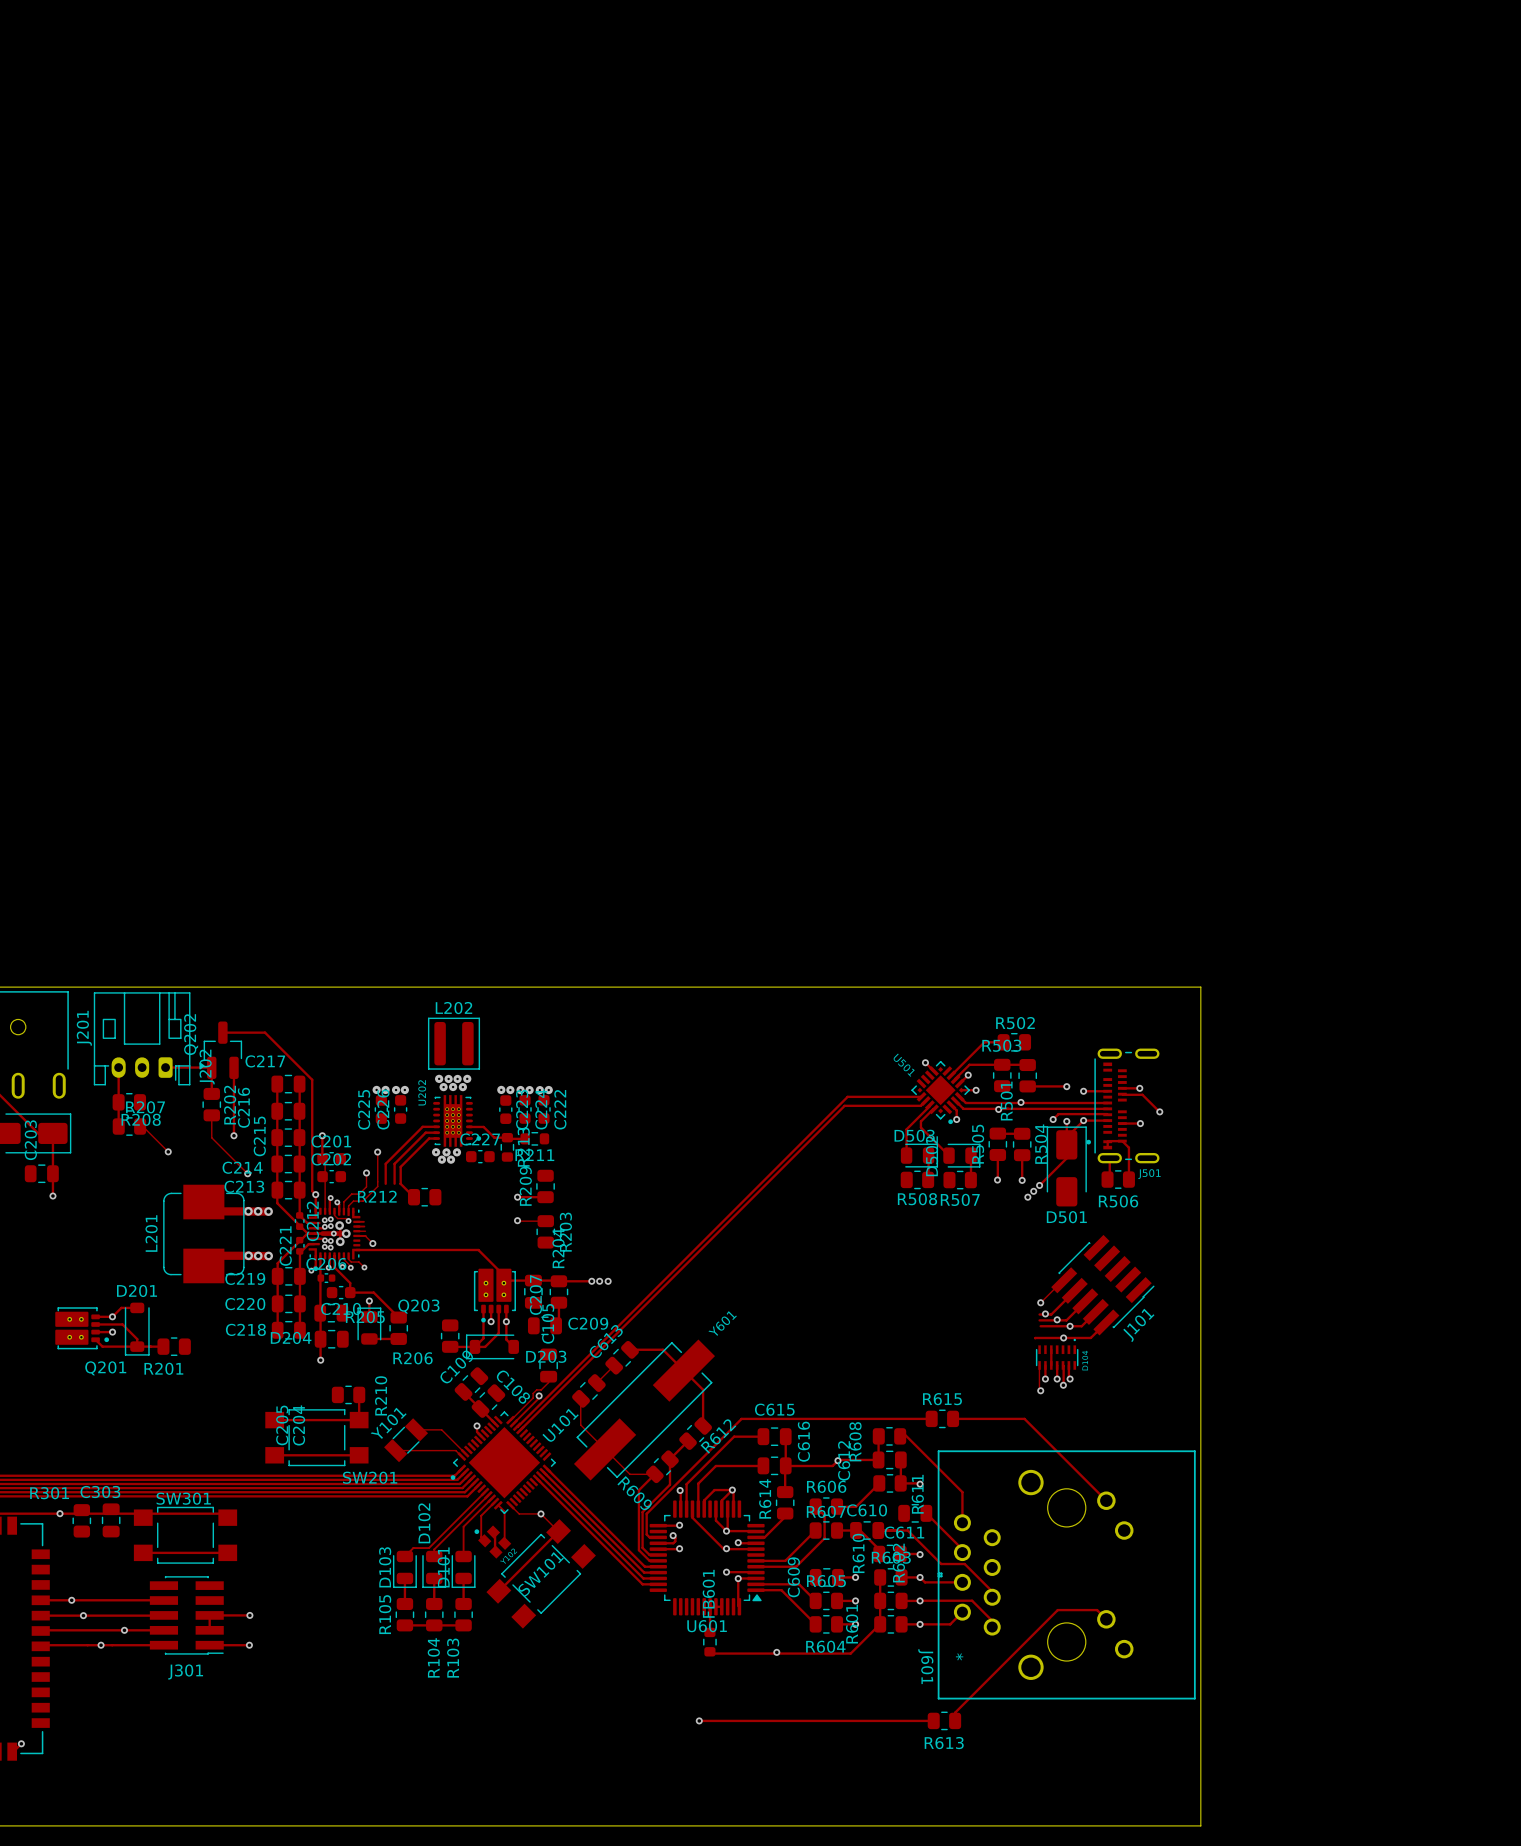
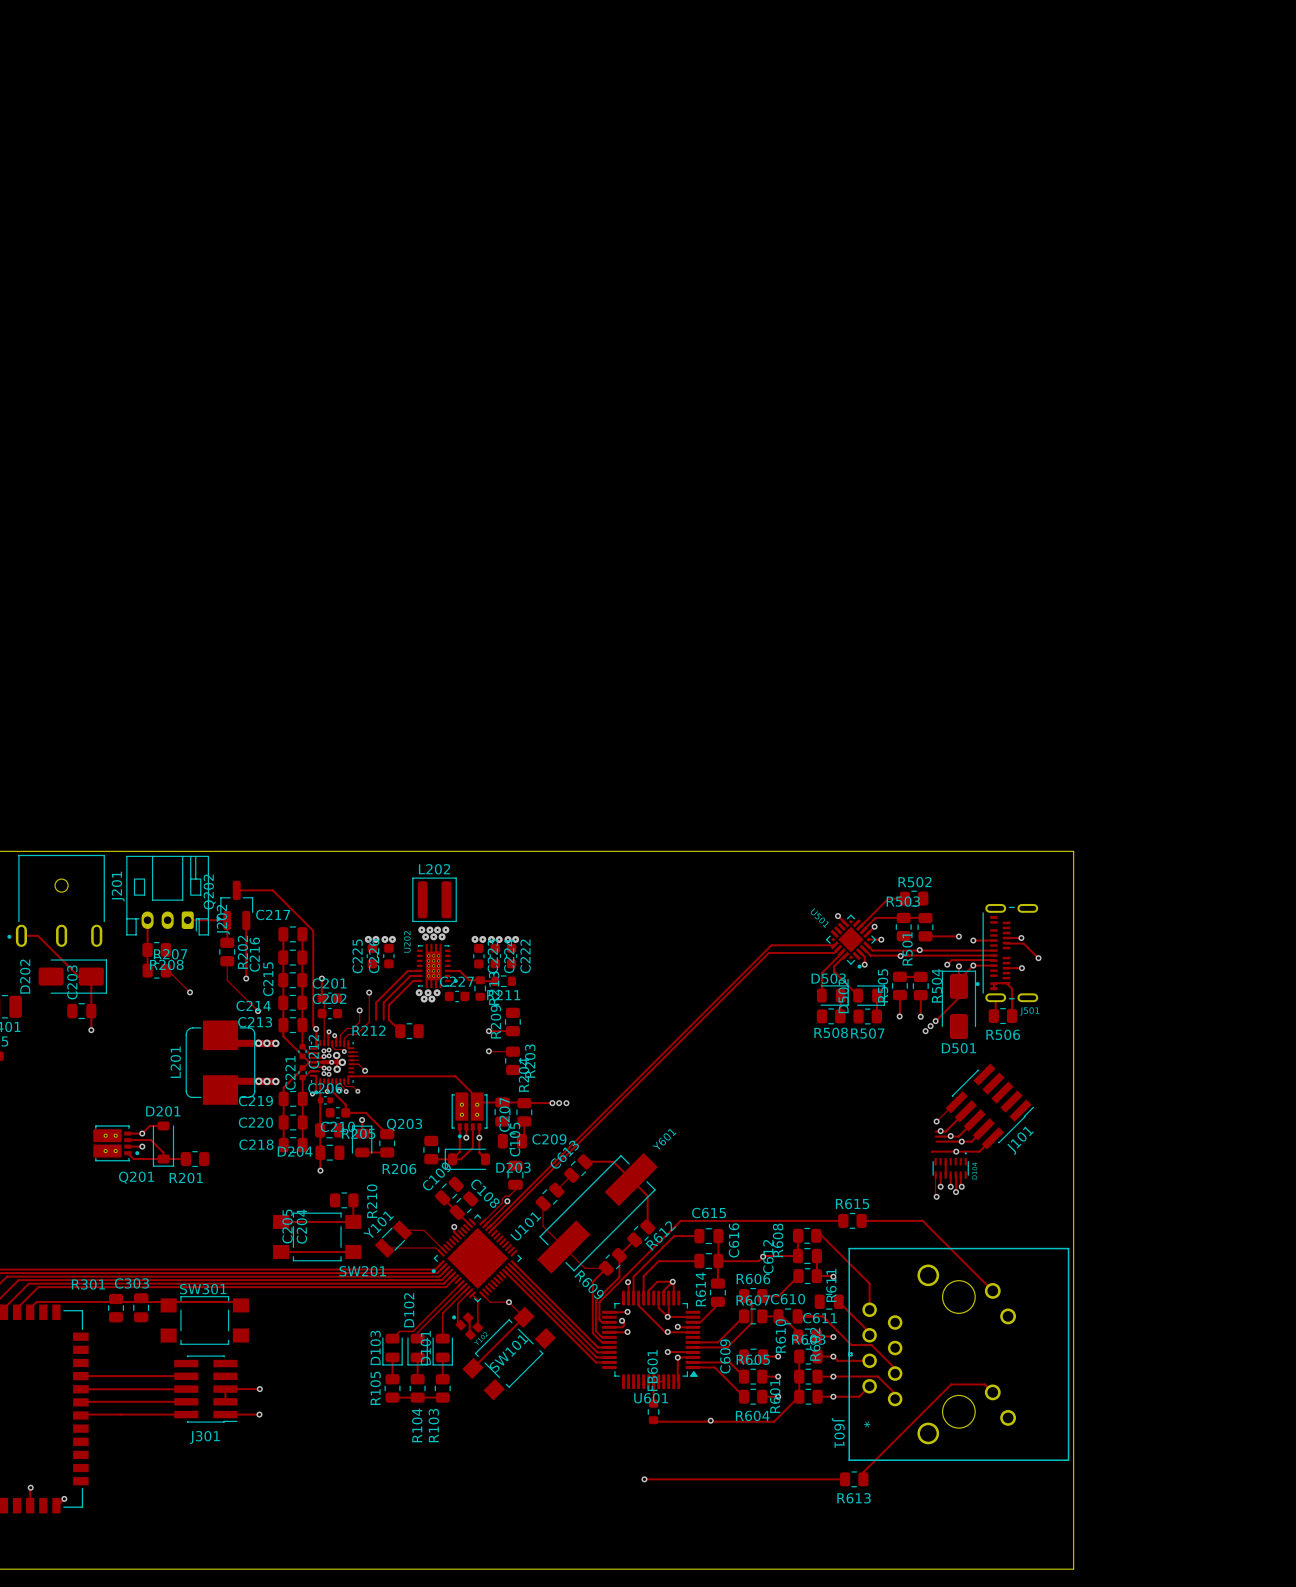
via: (59, 1513) -> none
track: (143, 1552) (227, 1552) -> none
via: (71, 1600) -> none
via: (83, 1615) -> none
via: (124, 1630) -> none
via: (101, 1645) -> none

